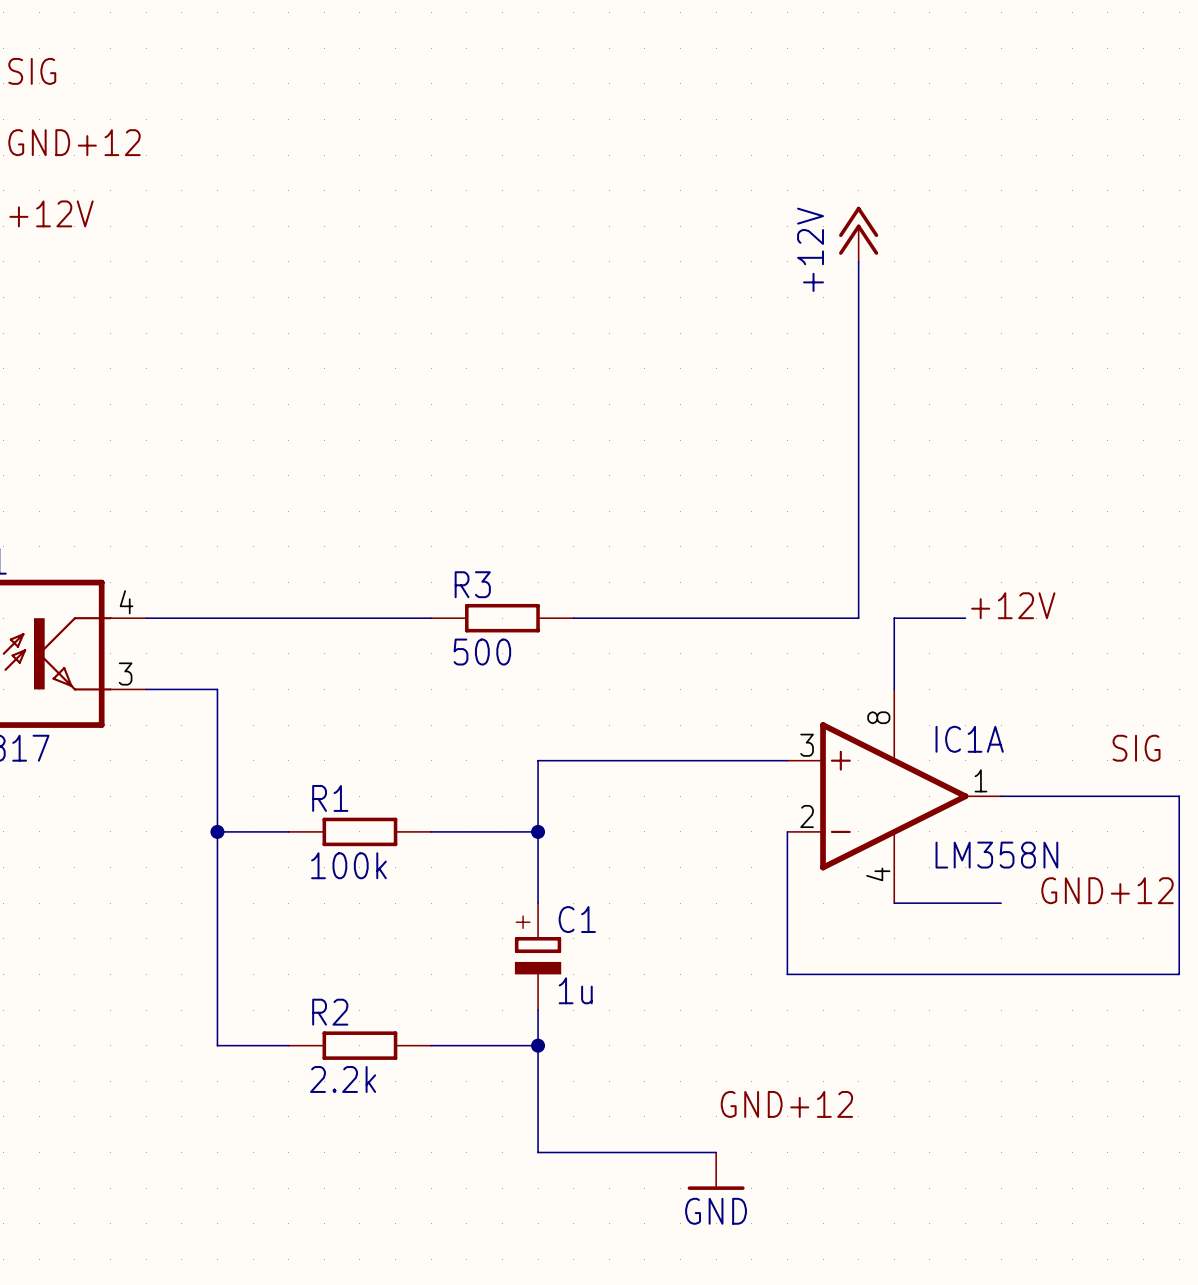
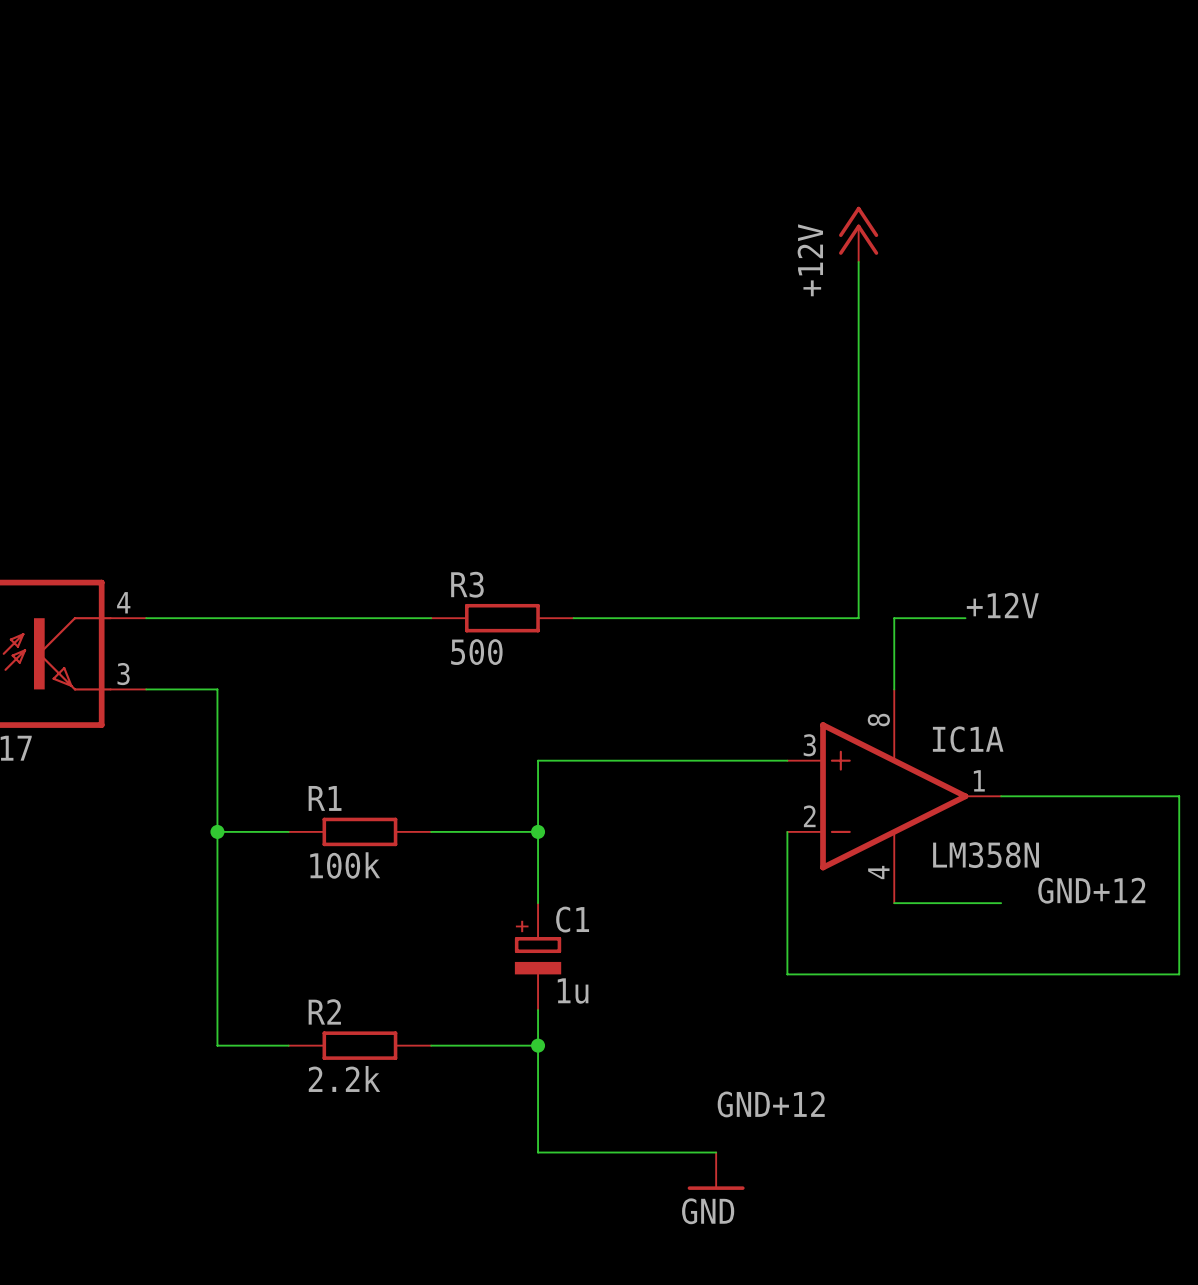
label: SIG (32, 71) -> none
label: GND+12 (74, 142) -> none
label: +12V (51, 213) -> none
label: SIG (1136, 748) -> none

